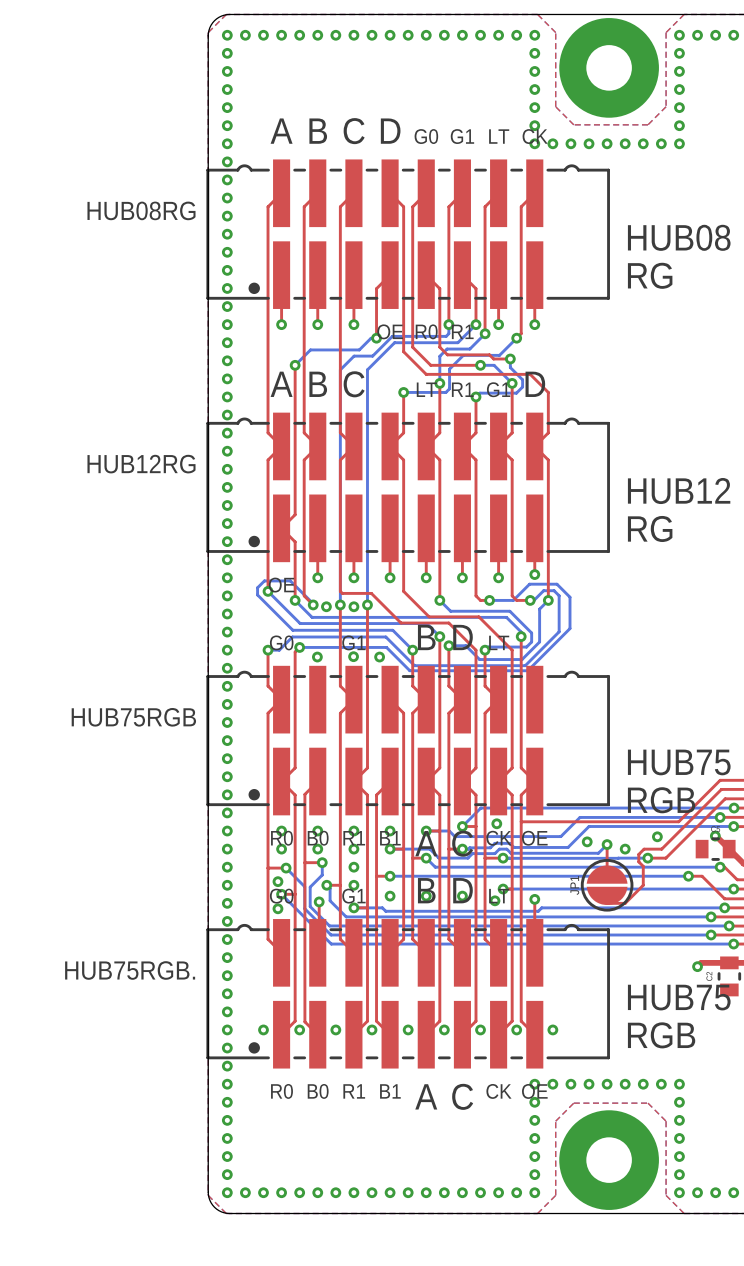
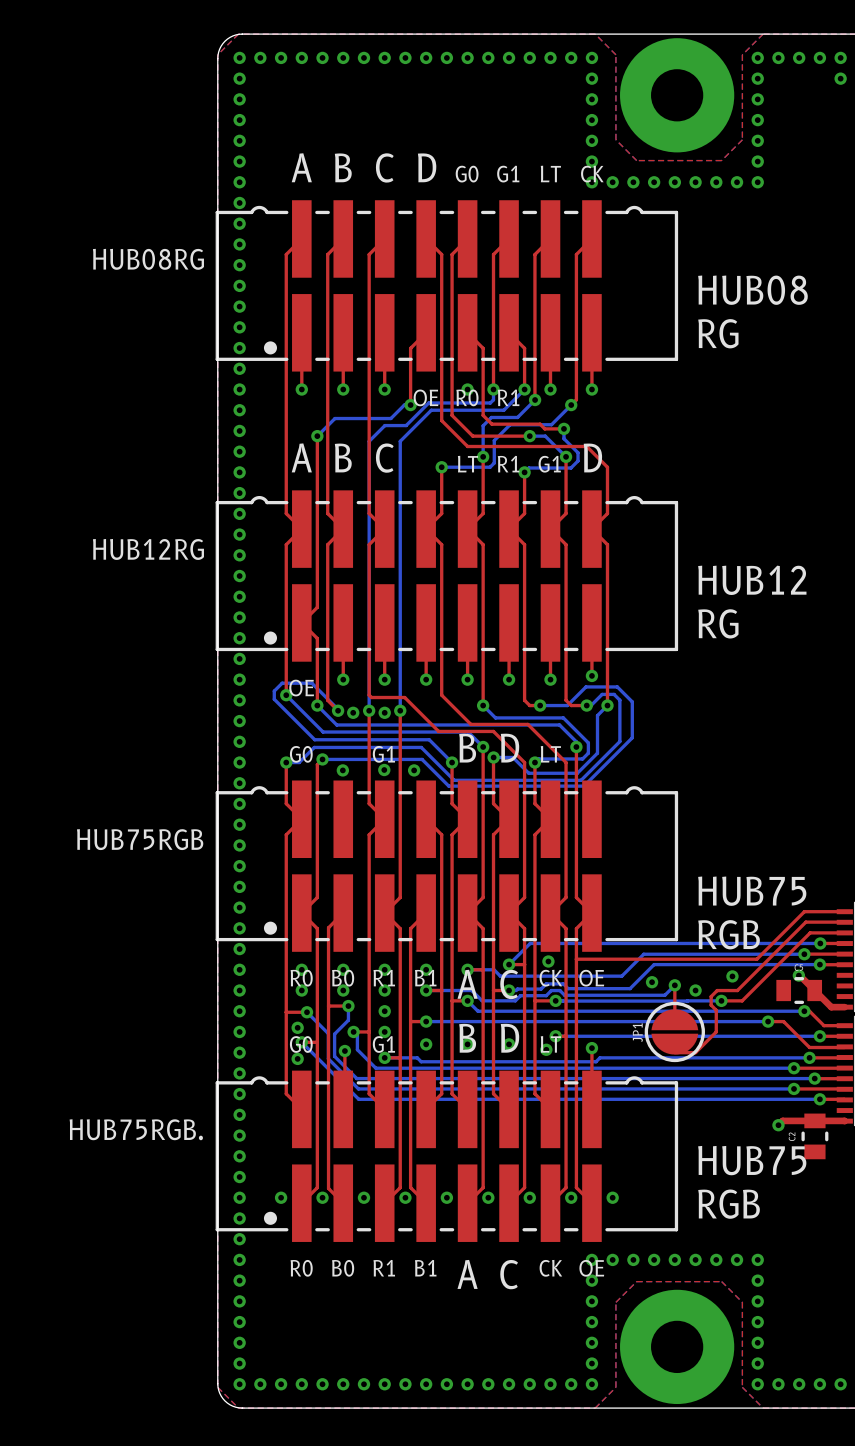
via: none -> (467, 389)

